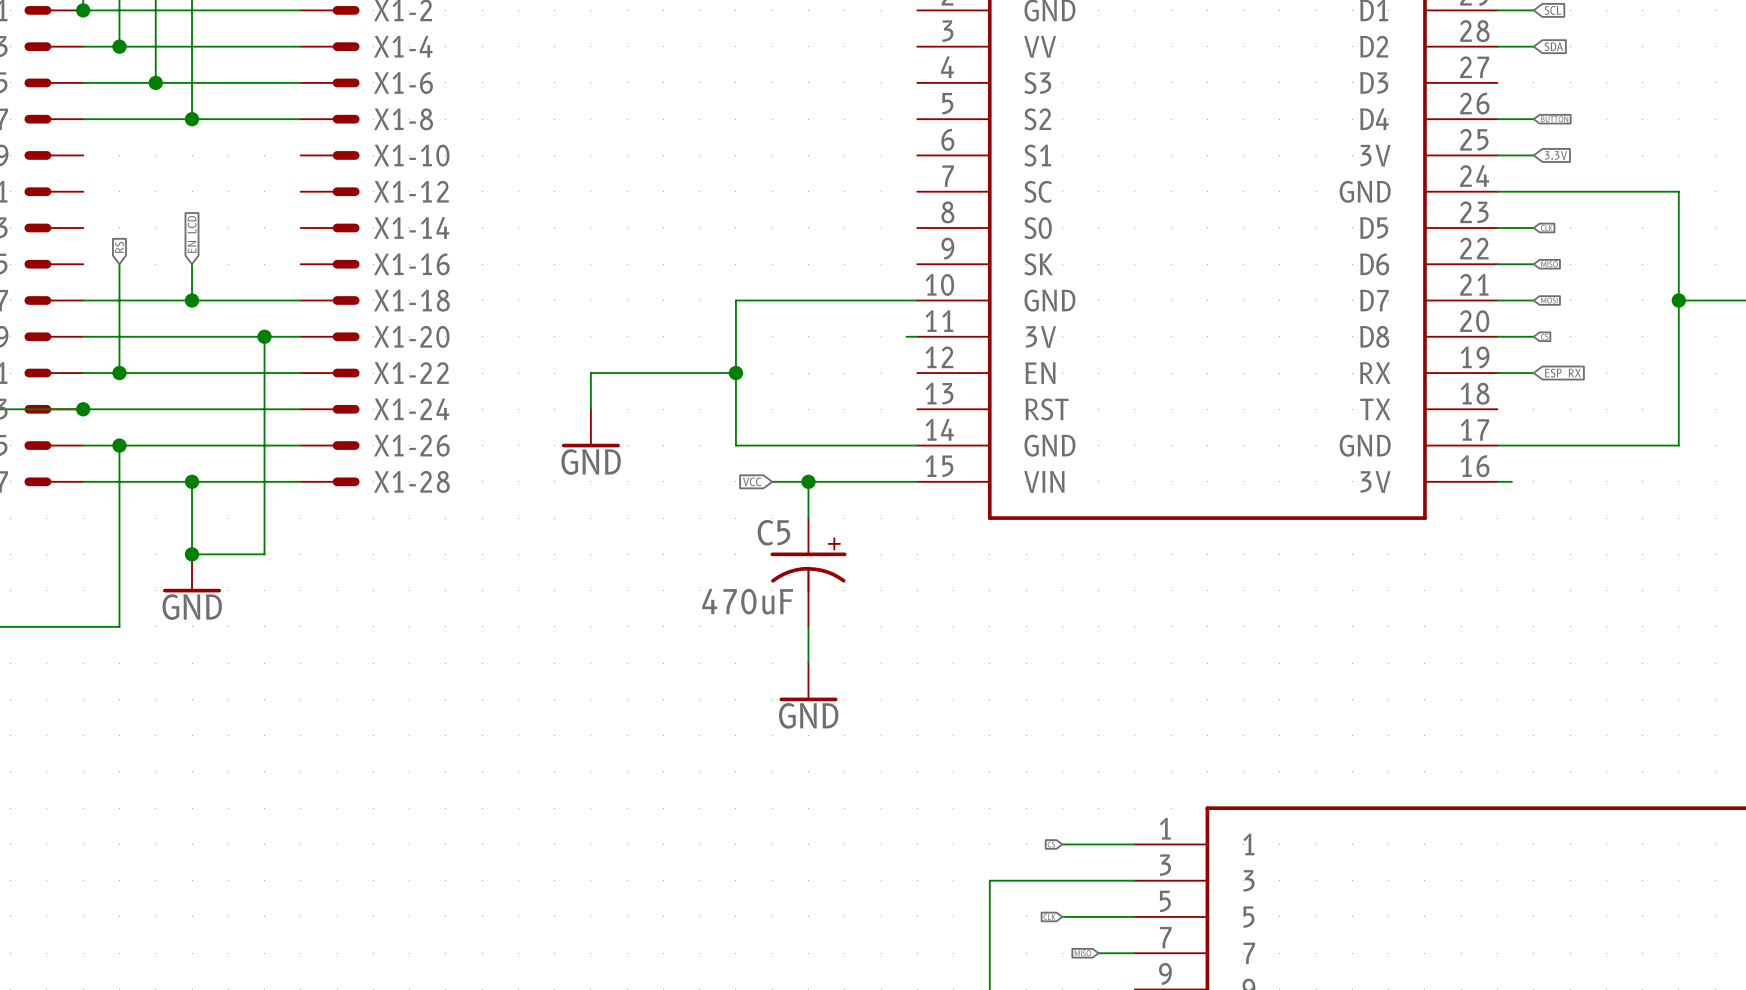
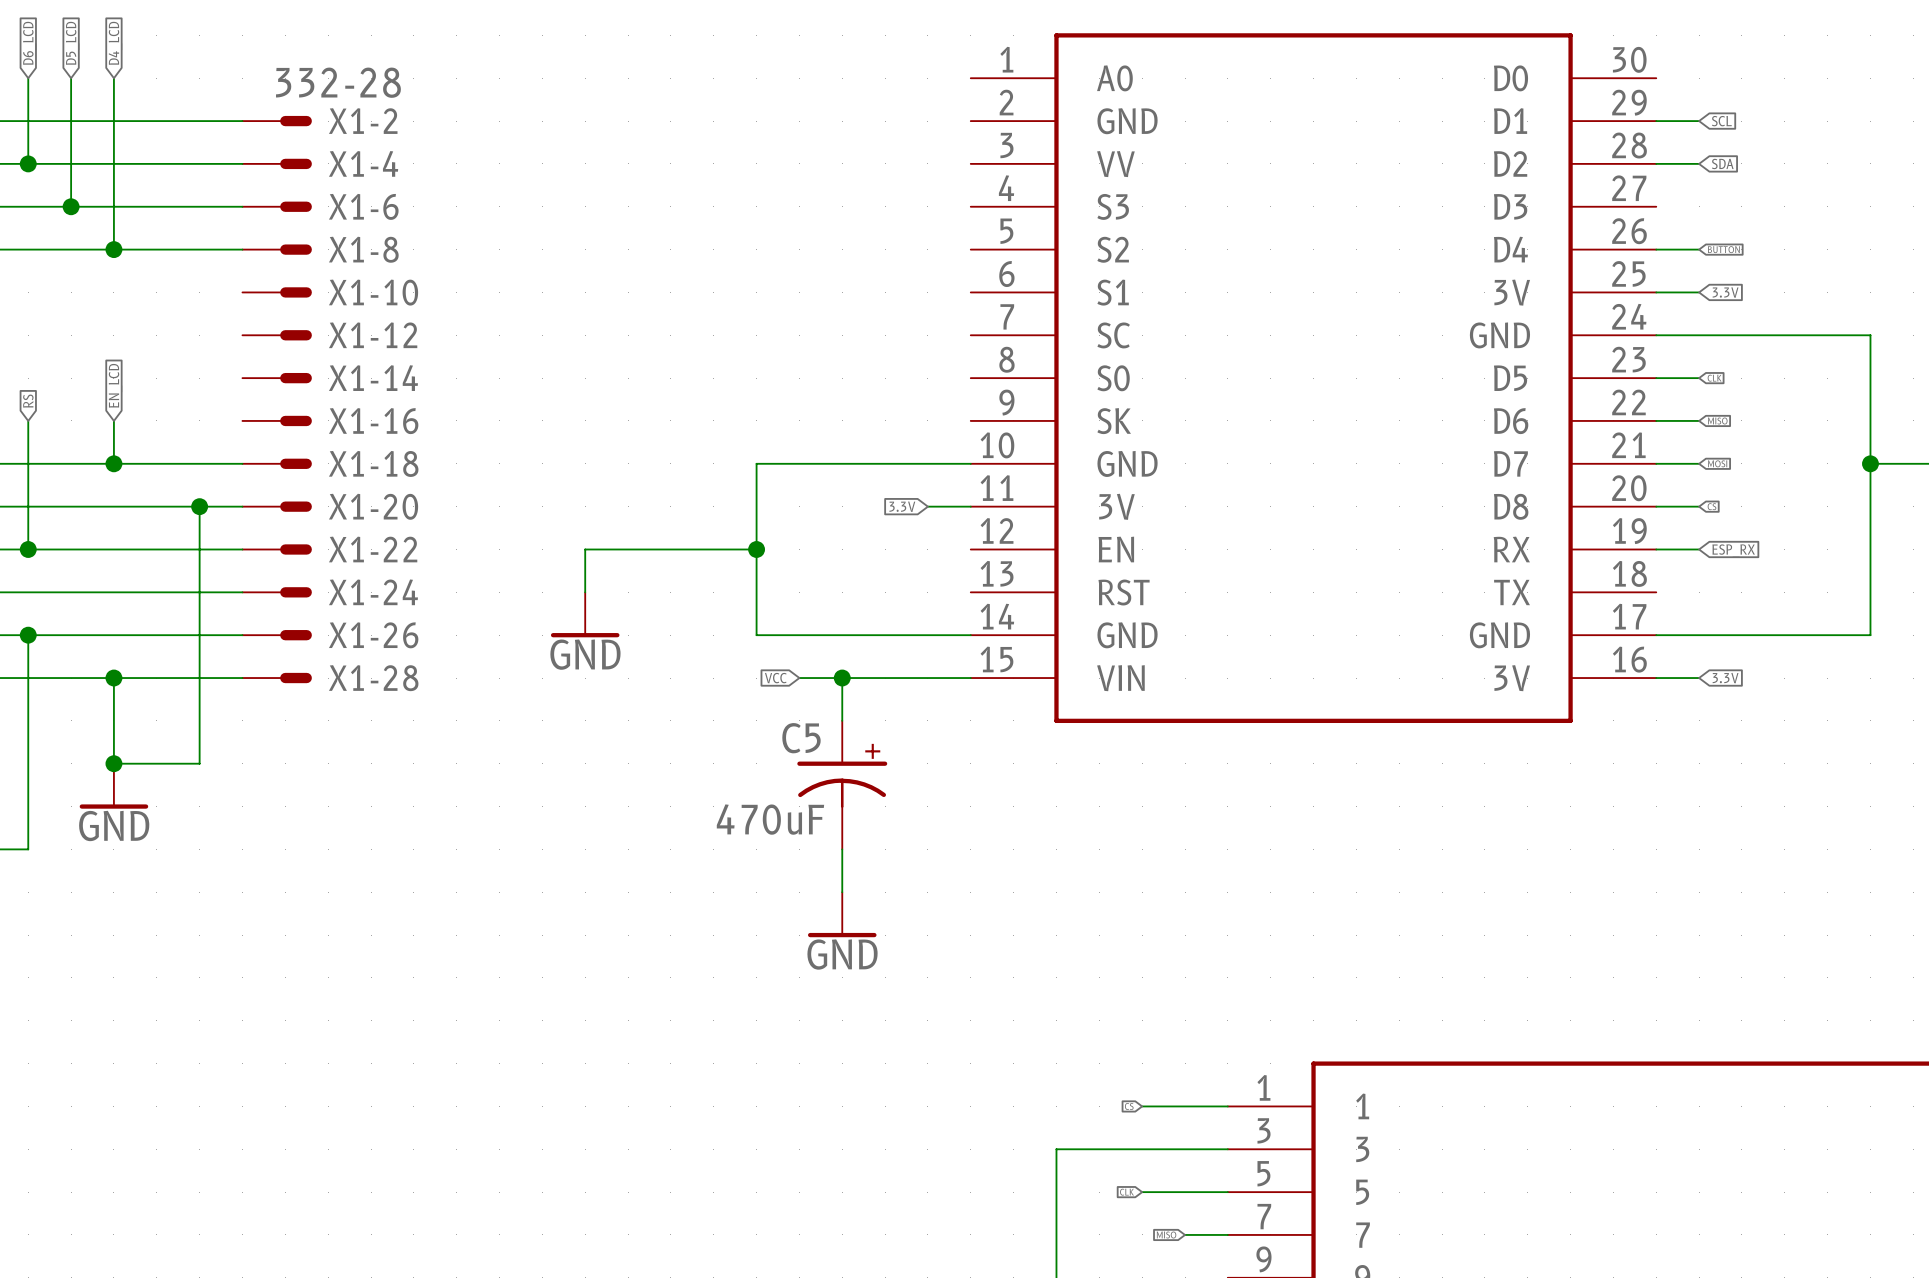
global label: none -> 3.3V (902, 506)
wire: none -> (927, 506) (957, 506)
wire: none -> (1673, 678) (1699, 678)
global label: none -> 3.3V (1725, 678)

